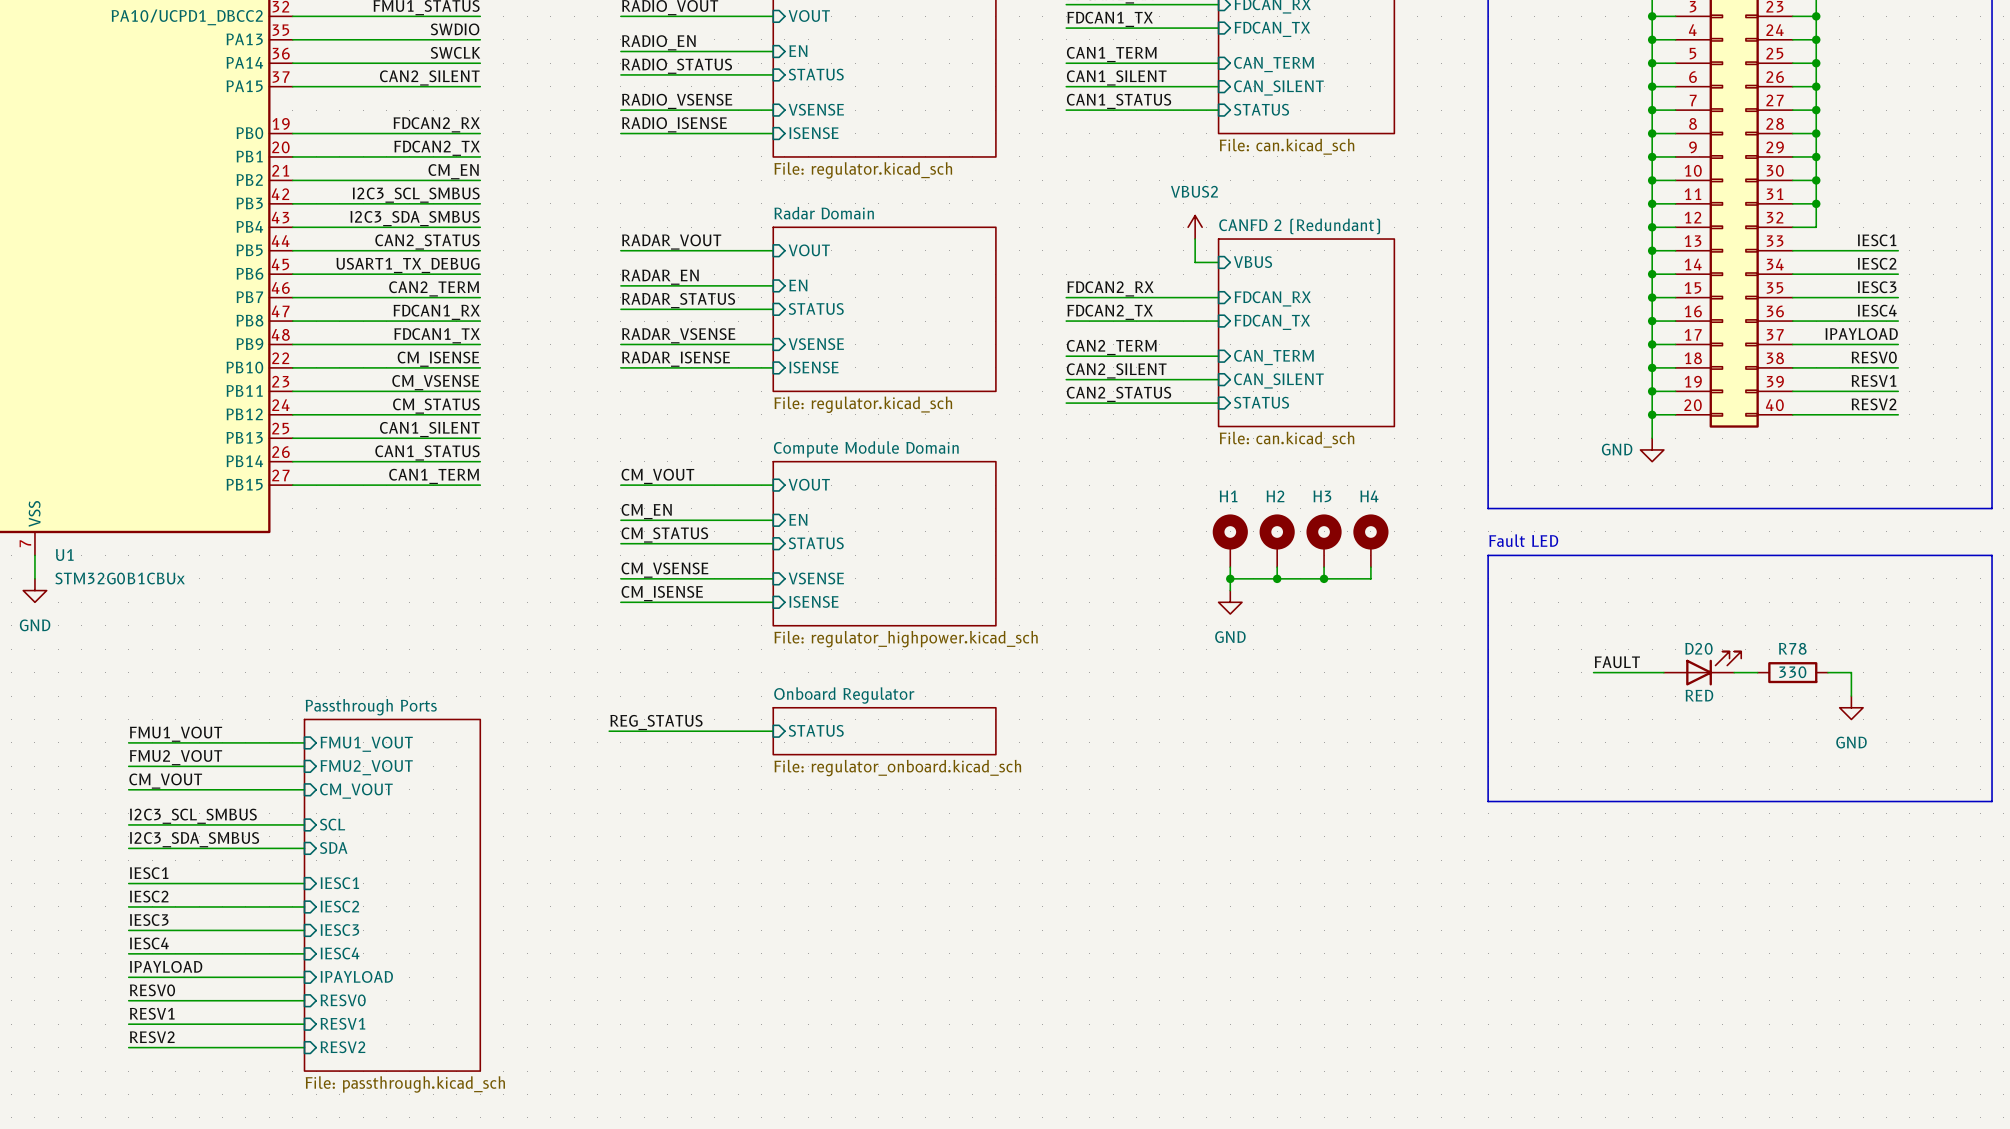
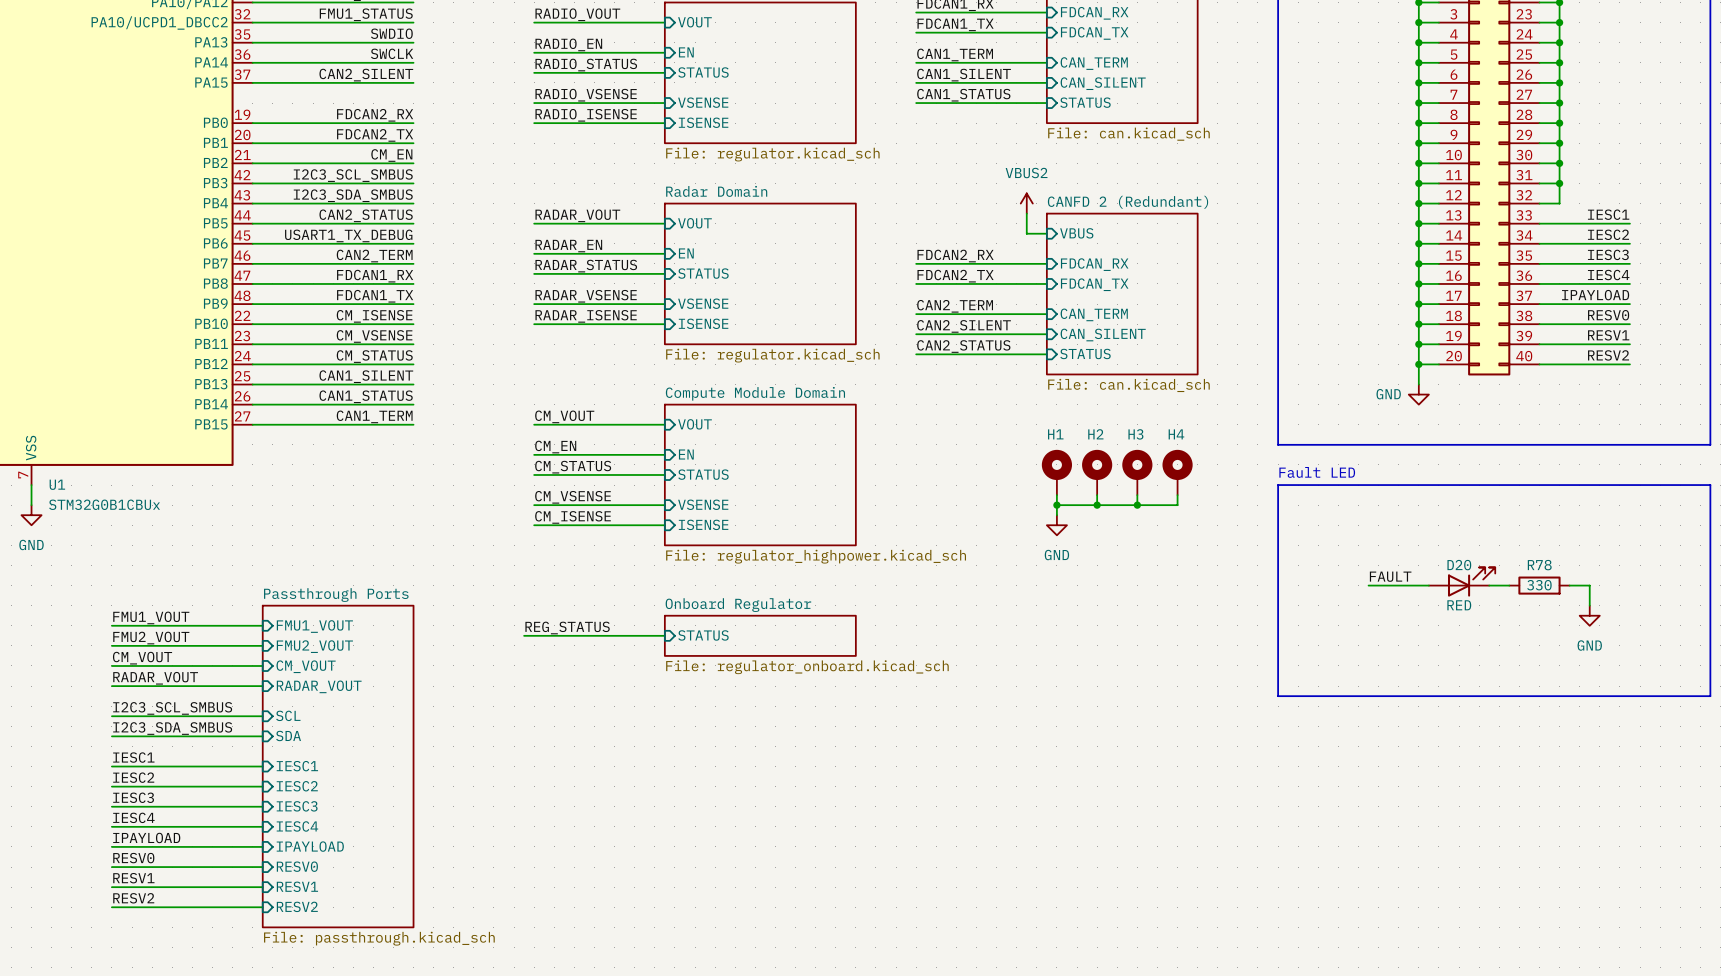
label: none -> FMU1_VOUT (151, 617)
wire: none -> (111, 625) (262, 625)
sheet pin: none -> FMU1_VOUT (314, 626)
label: FMU1_VOUT (176, 734) -> FMU2_VOUT (151, 638)
sheet pin: FMU1_VOUT (366, 744) -> FMU2_VOUT (314, 646)
label: FMU2_VOUT (176, 757) -> CM_VOUT (142, 658)
sheet pin: FMU2_VOUT (366, 767) -> CM_VOUT (306, 666)
label: CM_VOUT (165, 781) -> RADAR_VOUT (155, 678)
sheet pin: CM_VOUT (356, 791) -> RADAR_VOUT (319, 686)
sheet Passthrough Ports: none -> File: passthrough.kicad_sch (338, 766)
sheet Passthrough Ports: File: passthrough.kicad_sch (392, 895) -> none

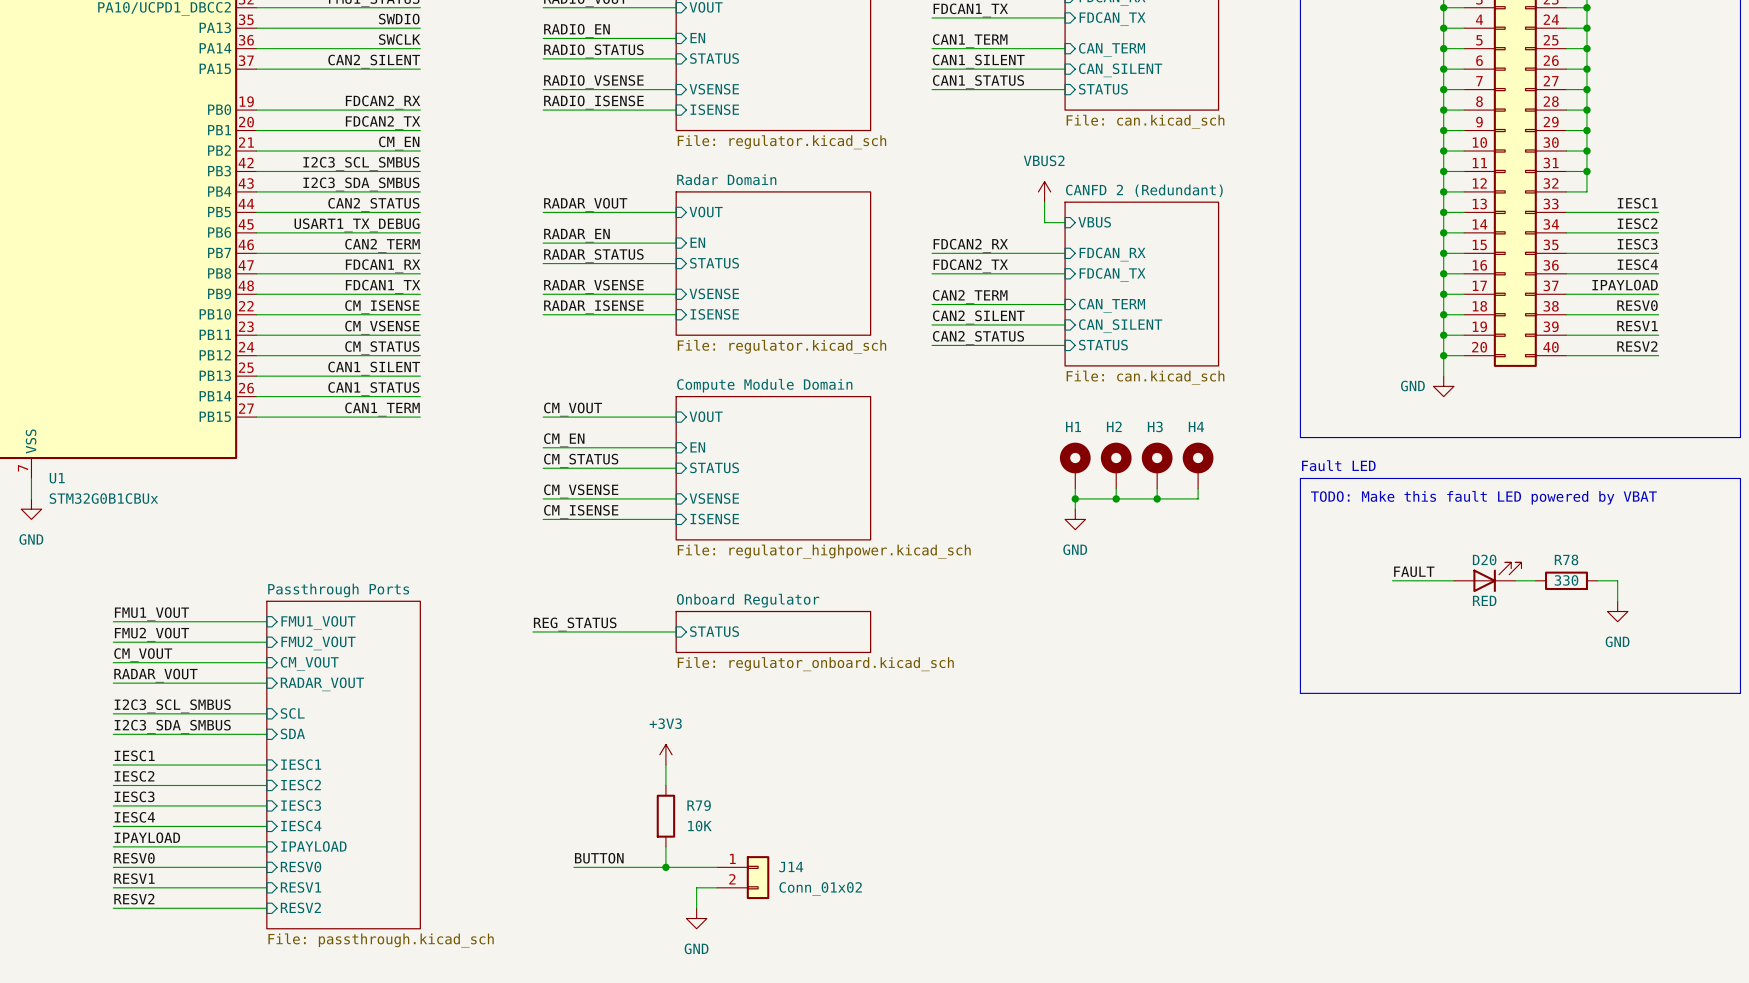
text: none -> TODO: Make this fault LED powered by VBAT (1483, 497)
power symbol: none -> +3V3 (665, 754)
wire: none -> (665, 765) (665, 785)
R79: none -> 10K (665, 816)
wire: none -> (665, 846) (665, 867)
label: none -> BUTTON (599, 858)
wire: none -> (573, 867) (717, 867)
junction: none -> (665, 867)
J14: none -> Conn_01x02 (743, 877)
wire: none -> (717, 887) (696, 887) (696, 908)
power symbol: none -> GND (696, 918)

